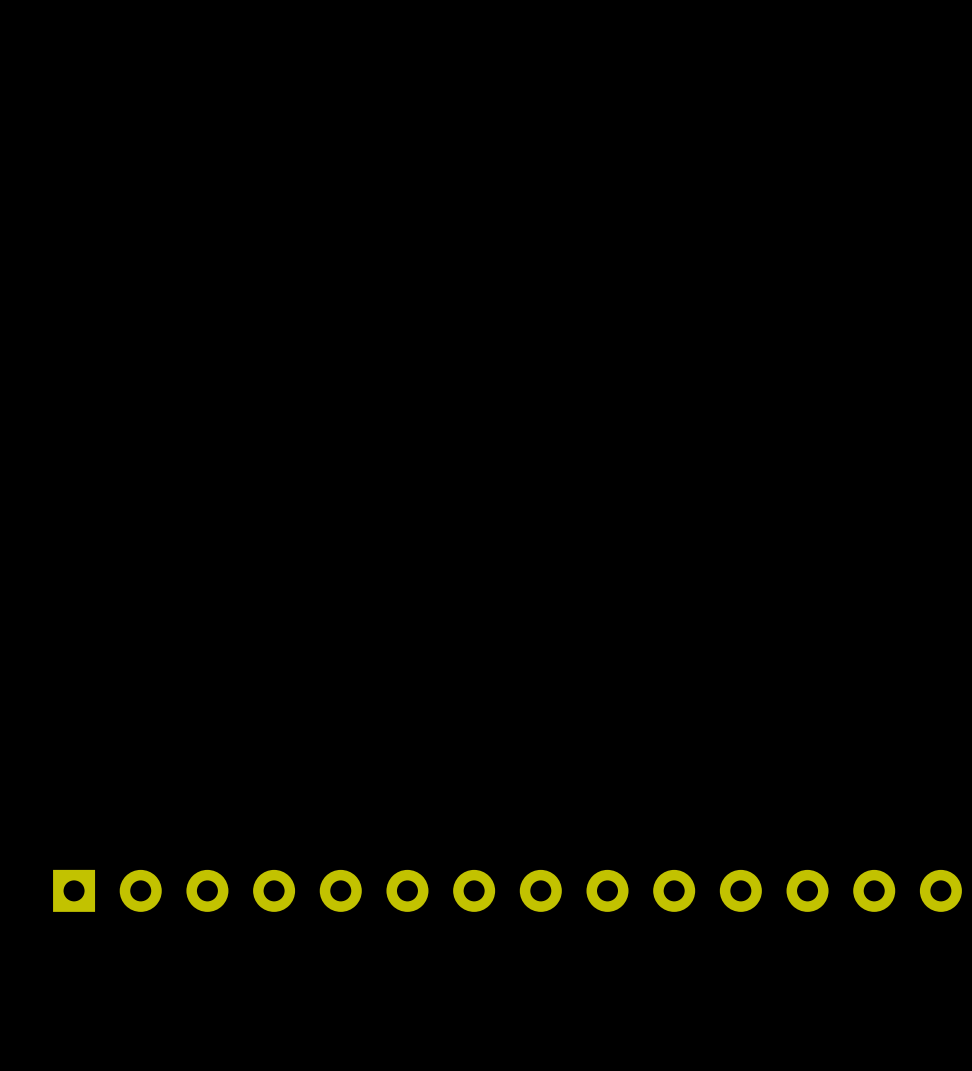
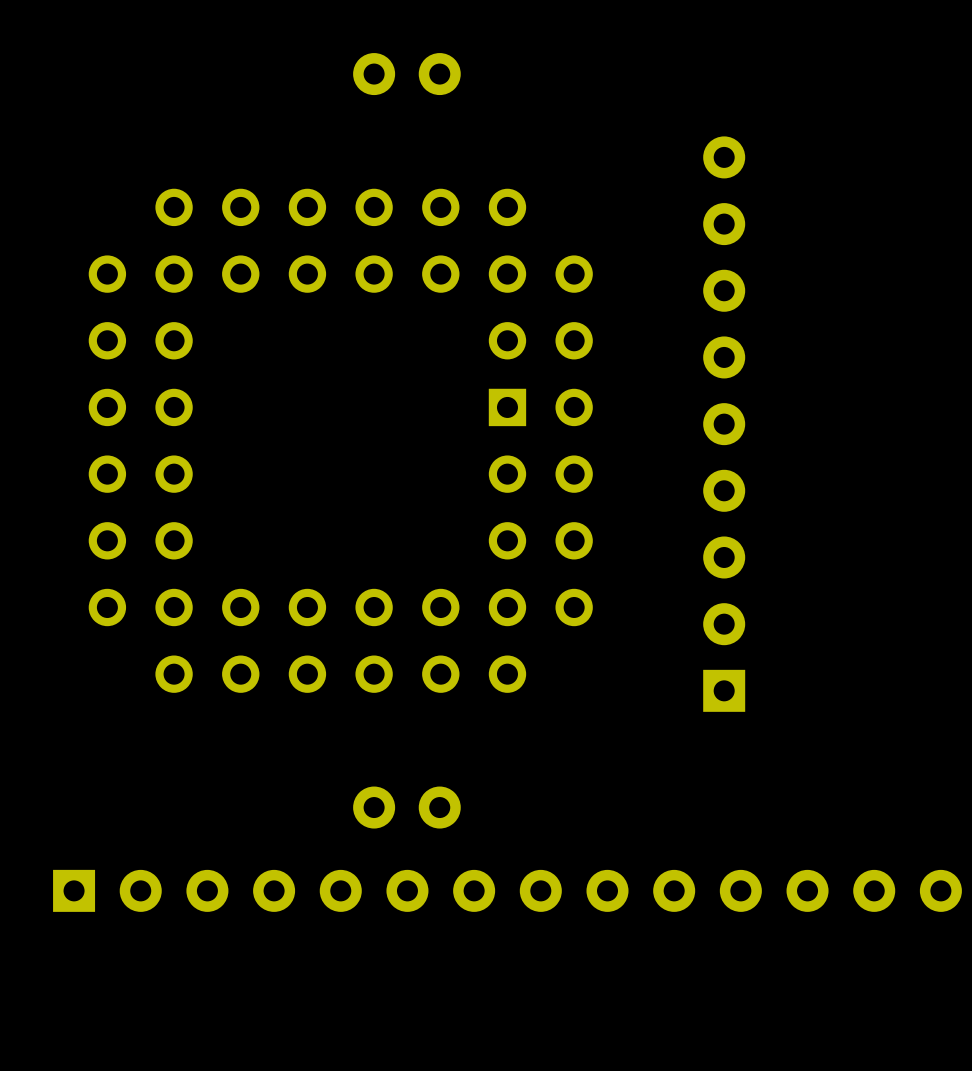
part: none -> (406, 74)
part: none -> (724, 424)
part: none -> (340, 440)
part: none -> (406, 807)

